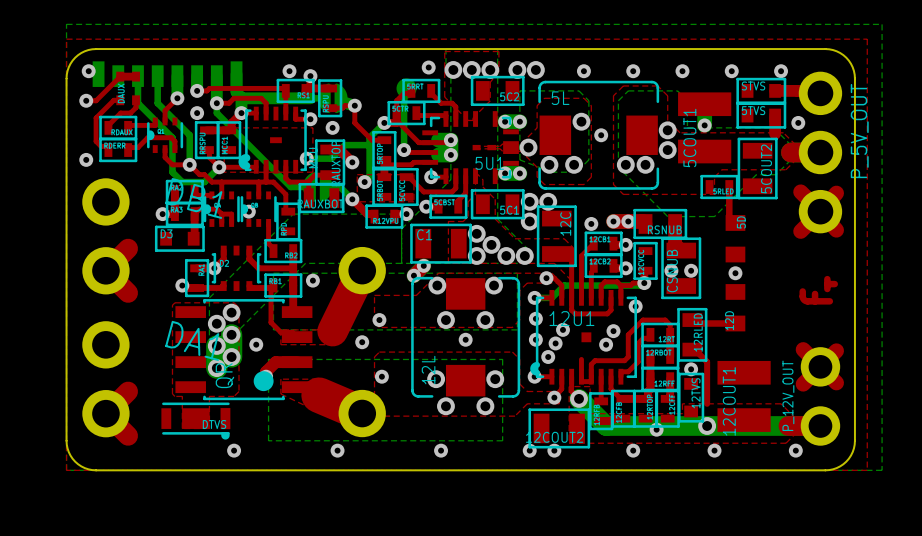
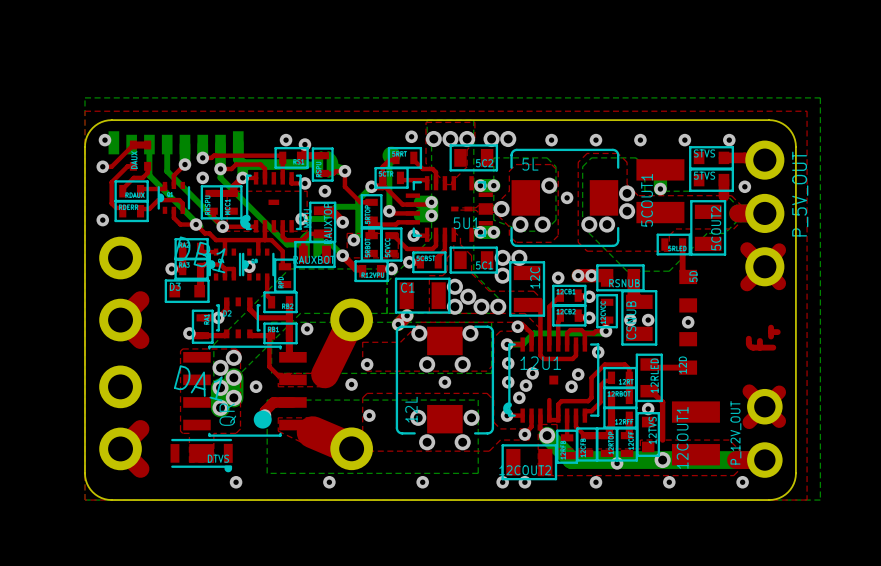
bottom track: (137, 103) (172, 137) (172, 172) (182, 182) (204, 182) (219, 167) -> (167, 169) (167, 171) (222, 226)
bottom track: none -> (149, 169) (149, 175) (200, 226)
bottom track: (157, 103) (189, 135) (189, 164) -> none

